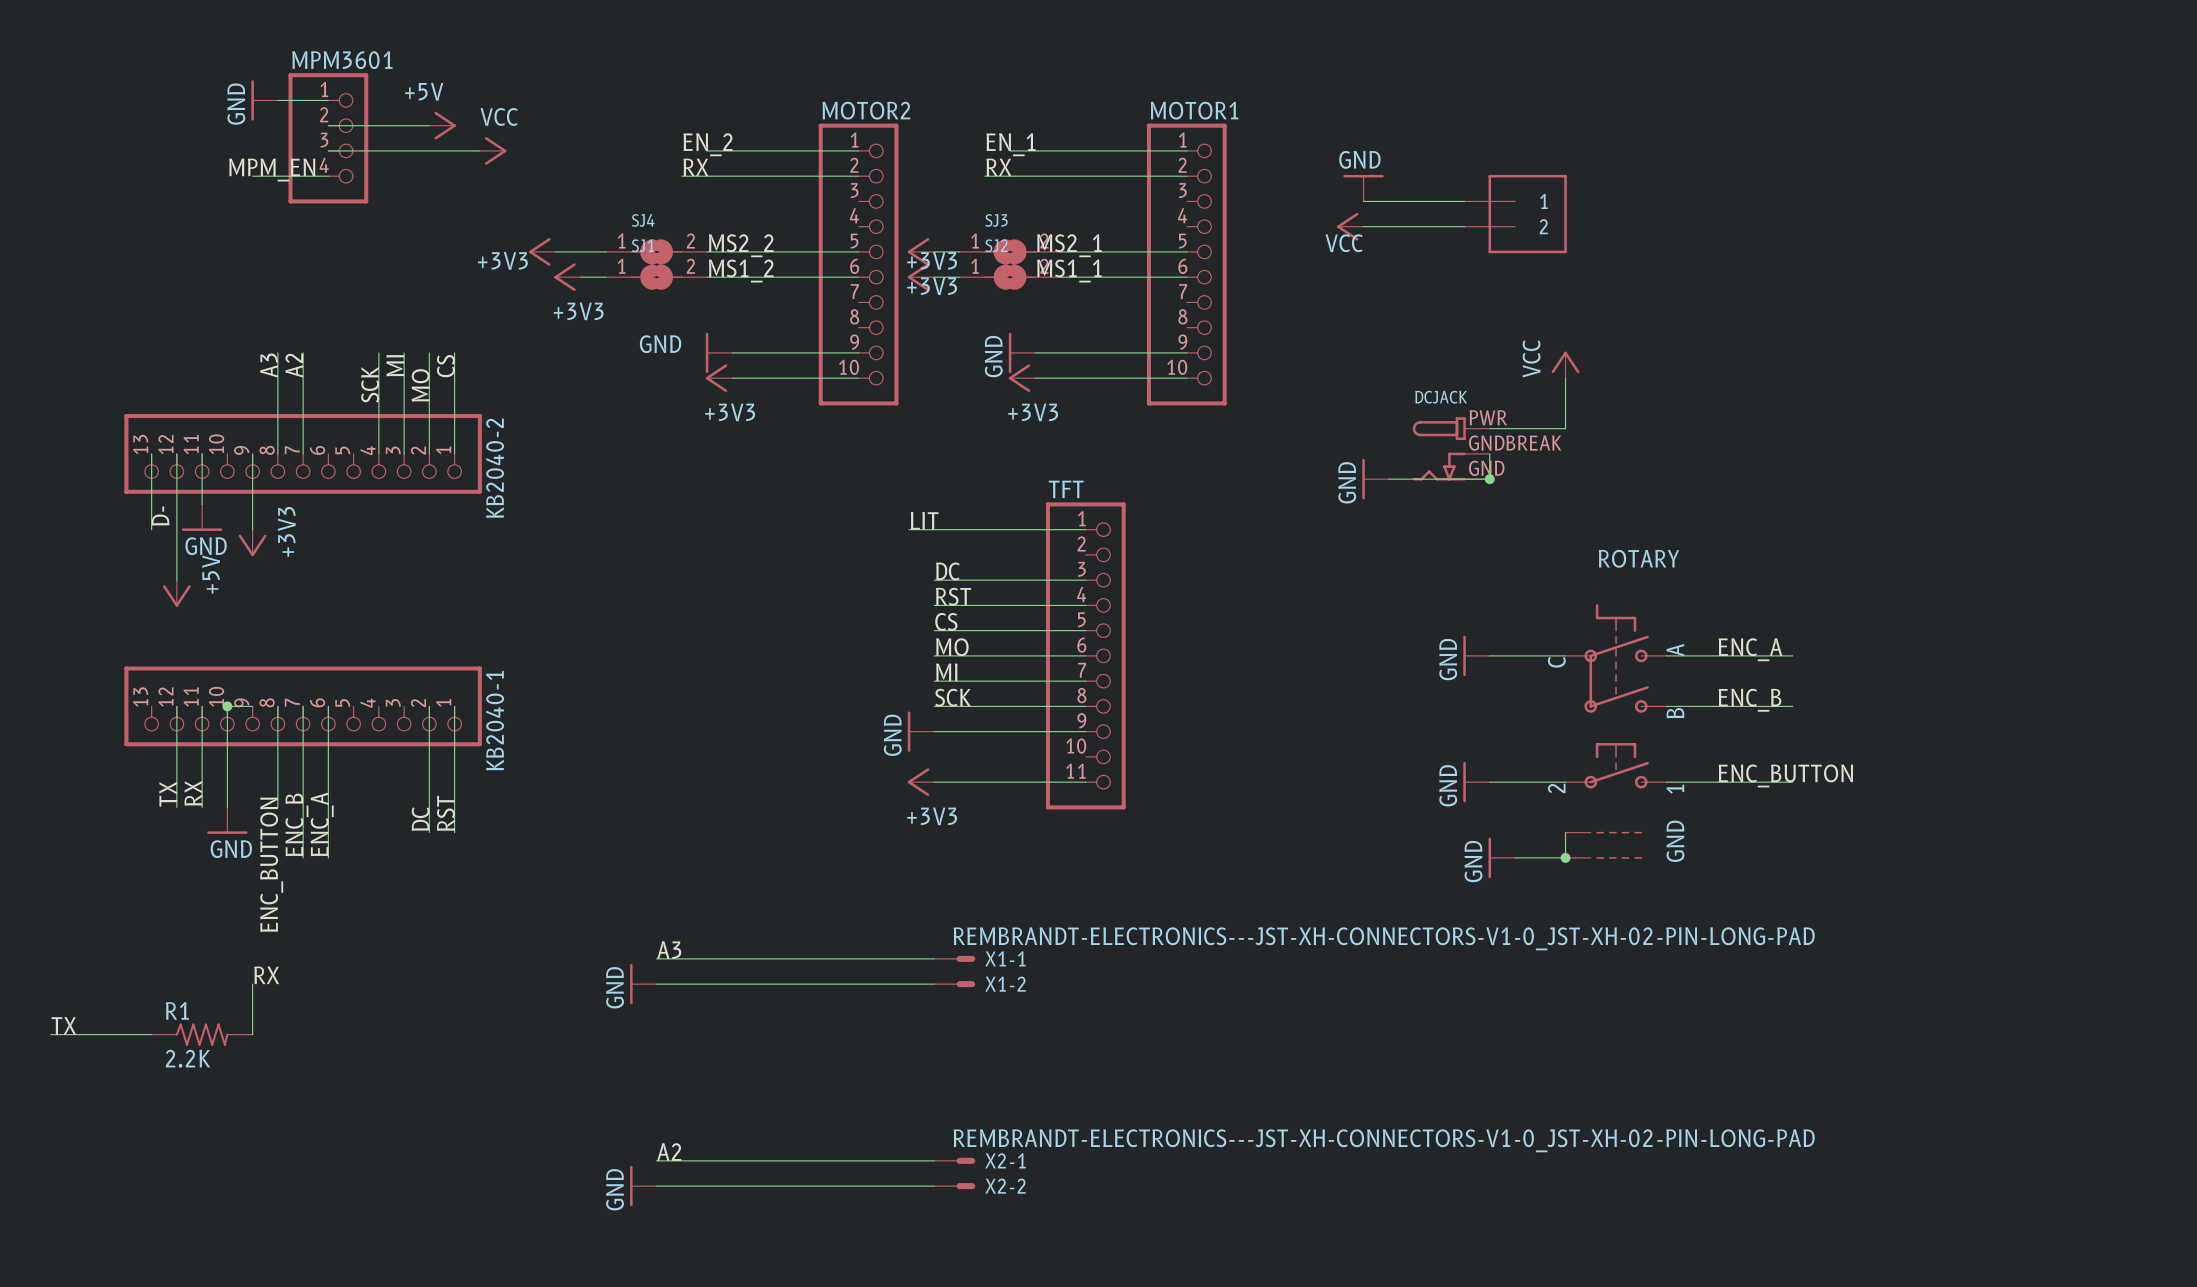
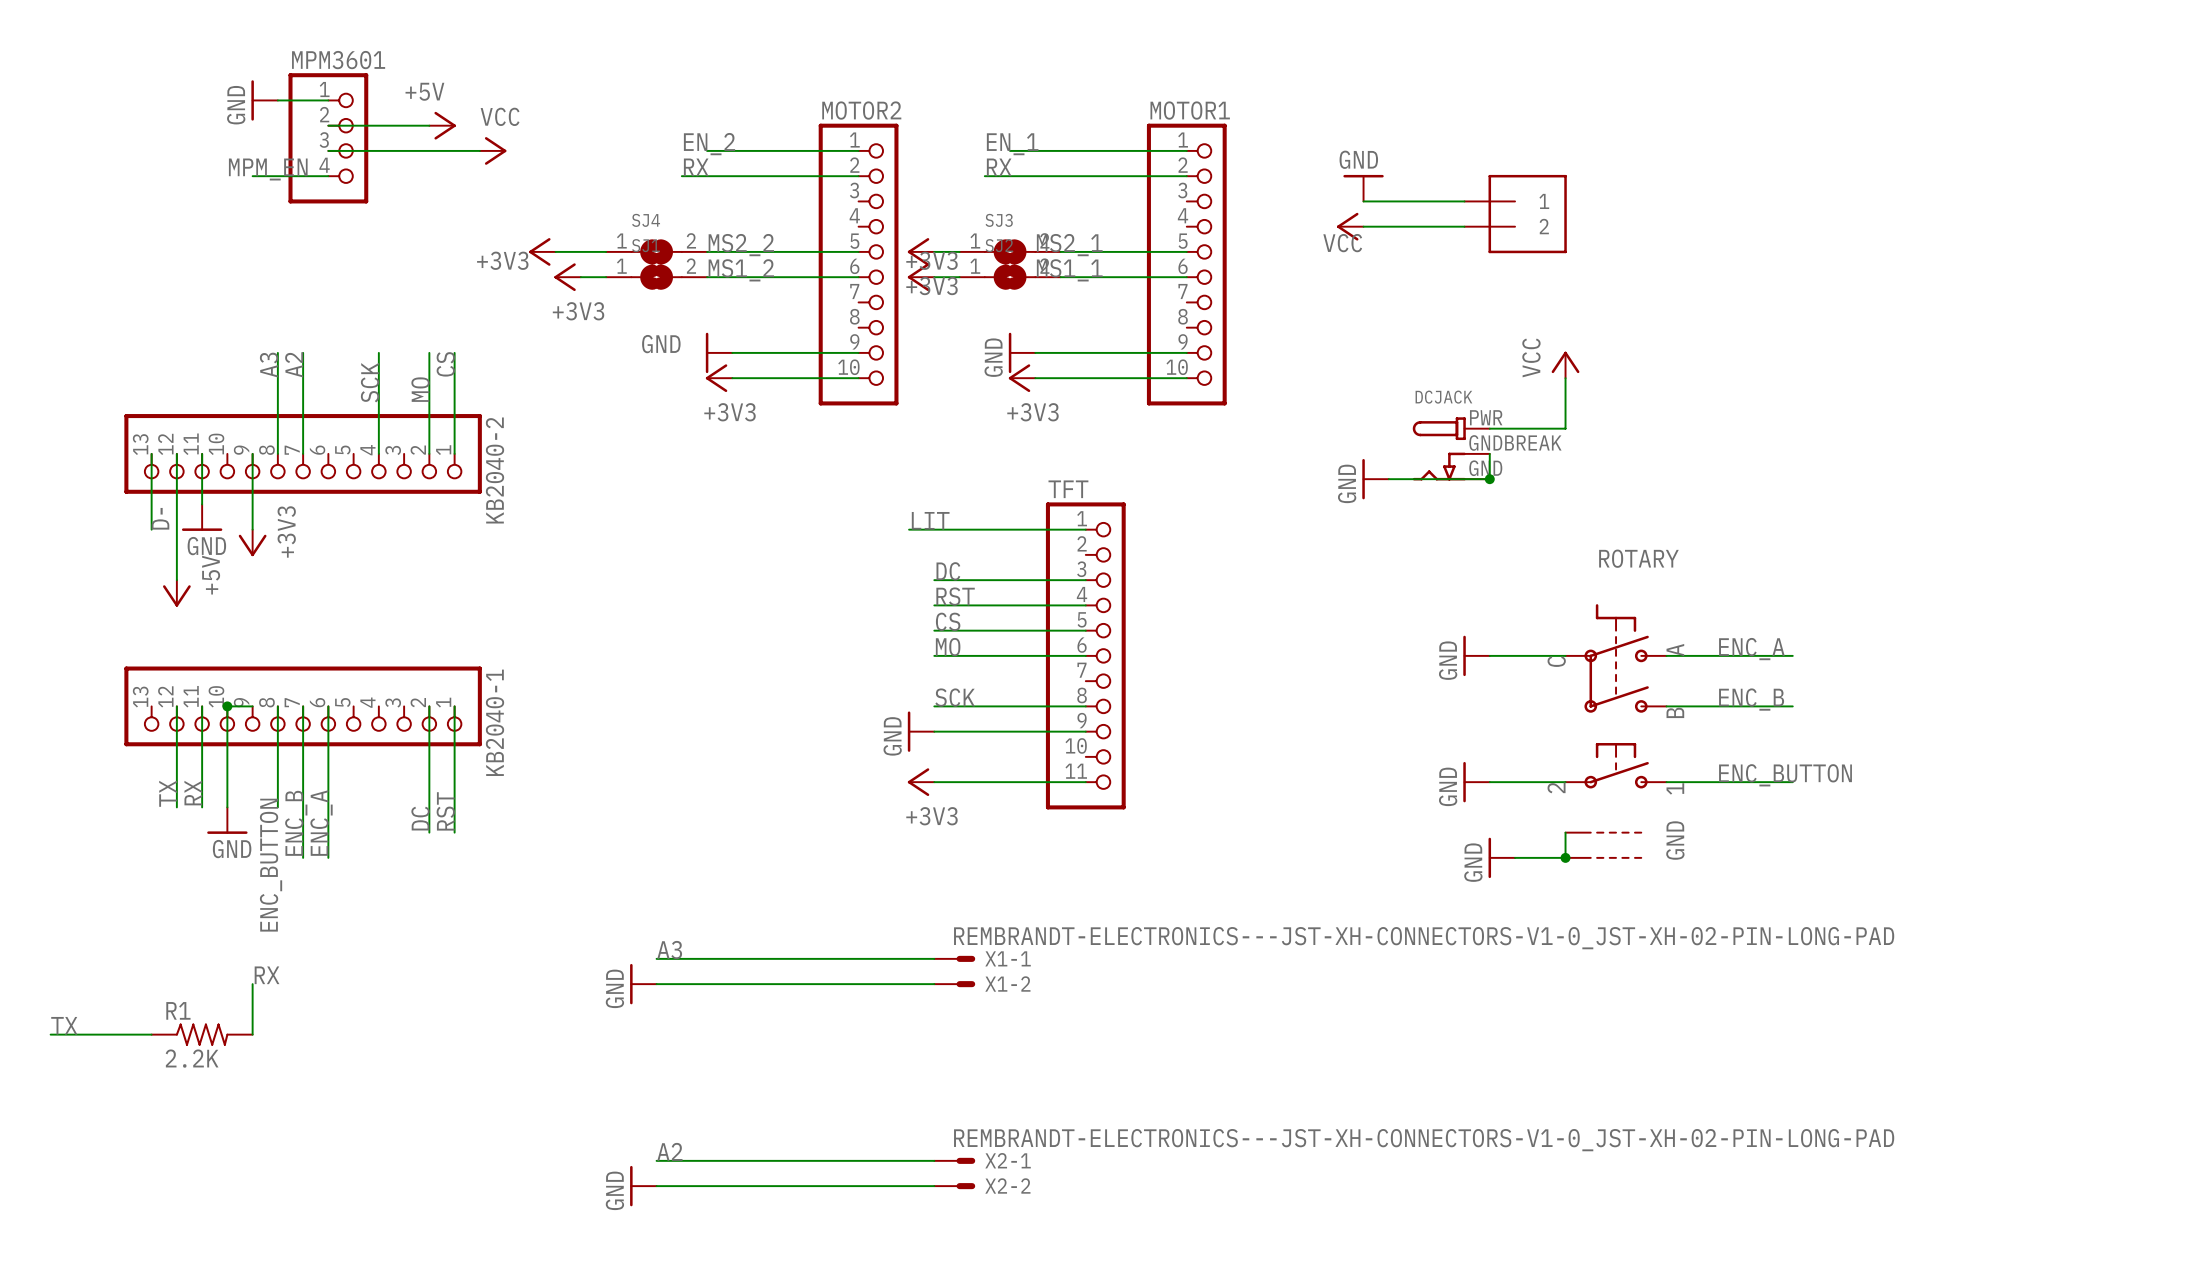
wire: (404, 352) (404, 453) -> none
label: MI (395, 365) -> none
label: MI (946, 672) -> none
wire: (934, 681) (1085, 681) -> none

